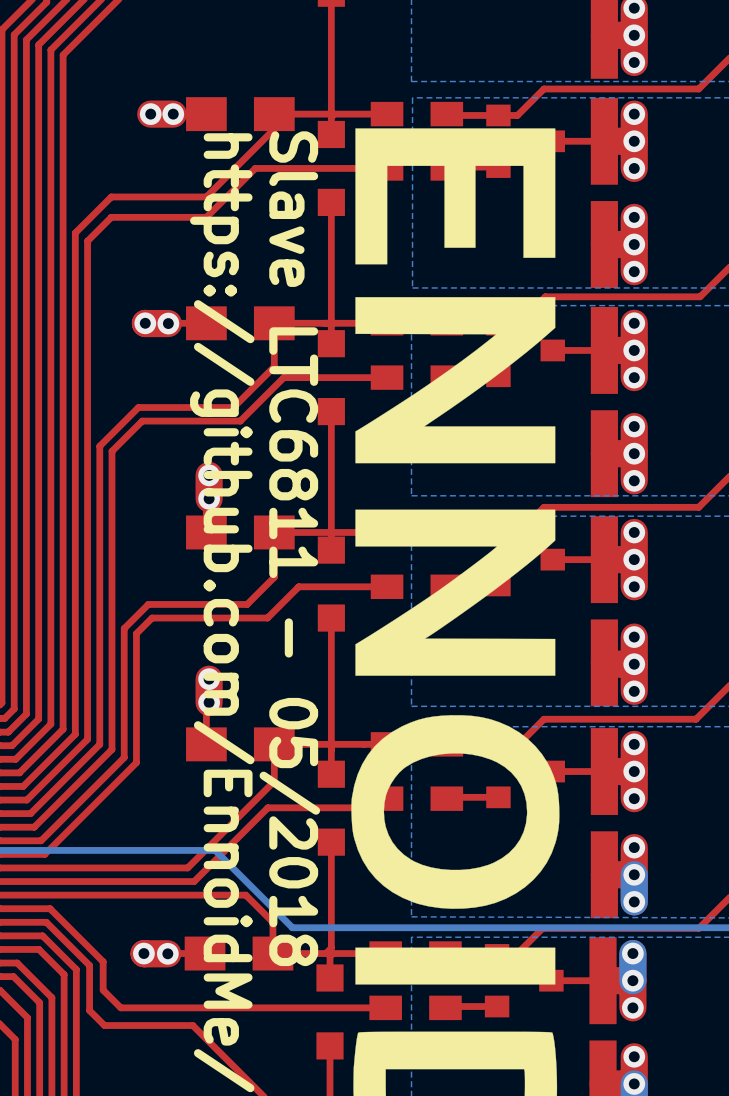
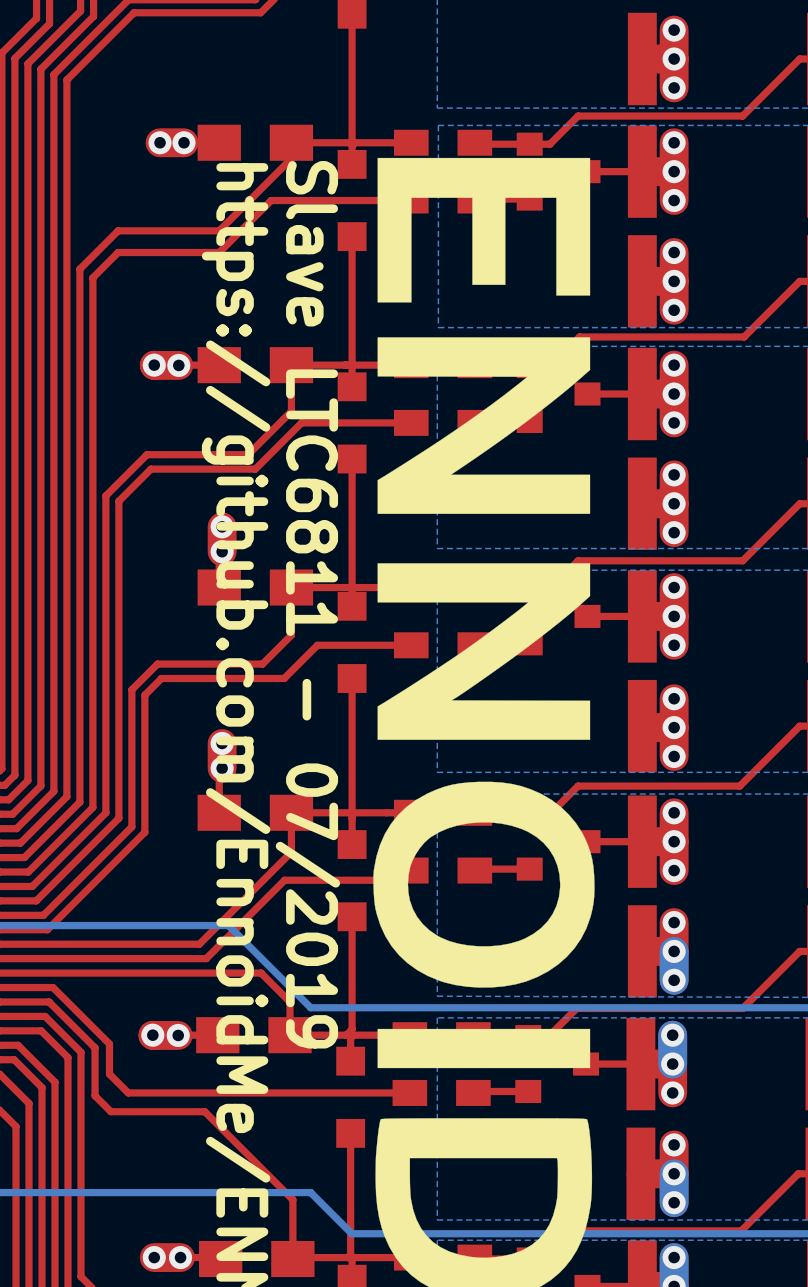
text: Slave LTC6811 - 05/2018 (289, 548) -> Slave LTC6811 - 07/2019 (307, 604)

